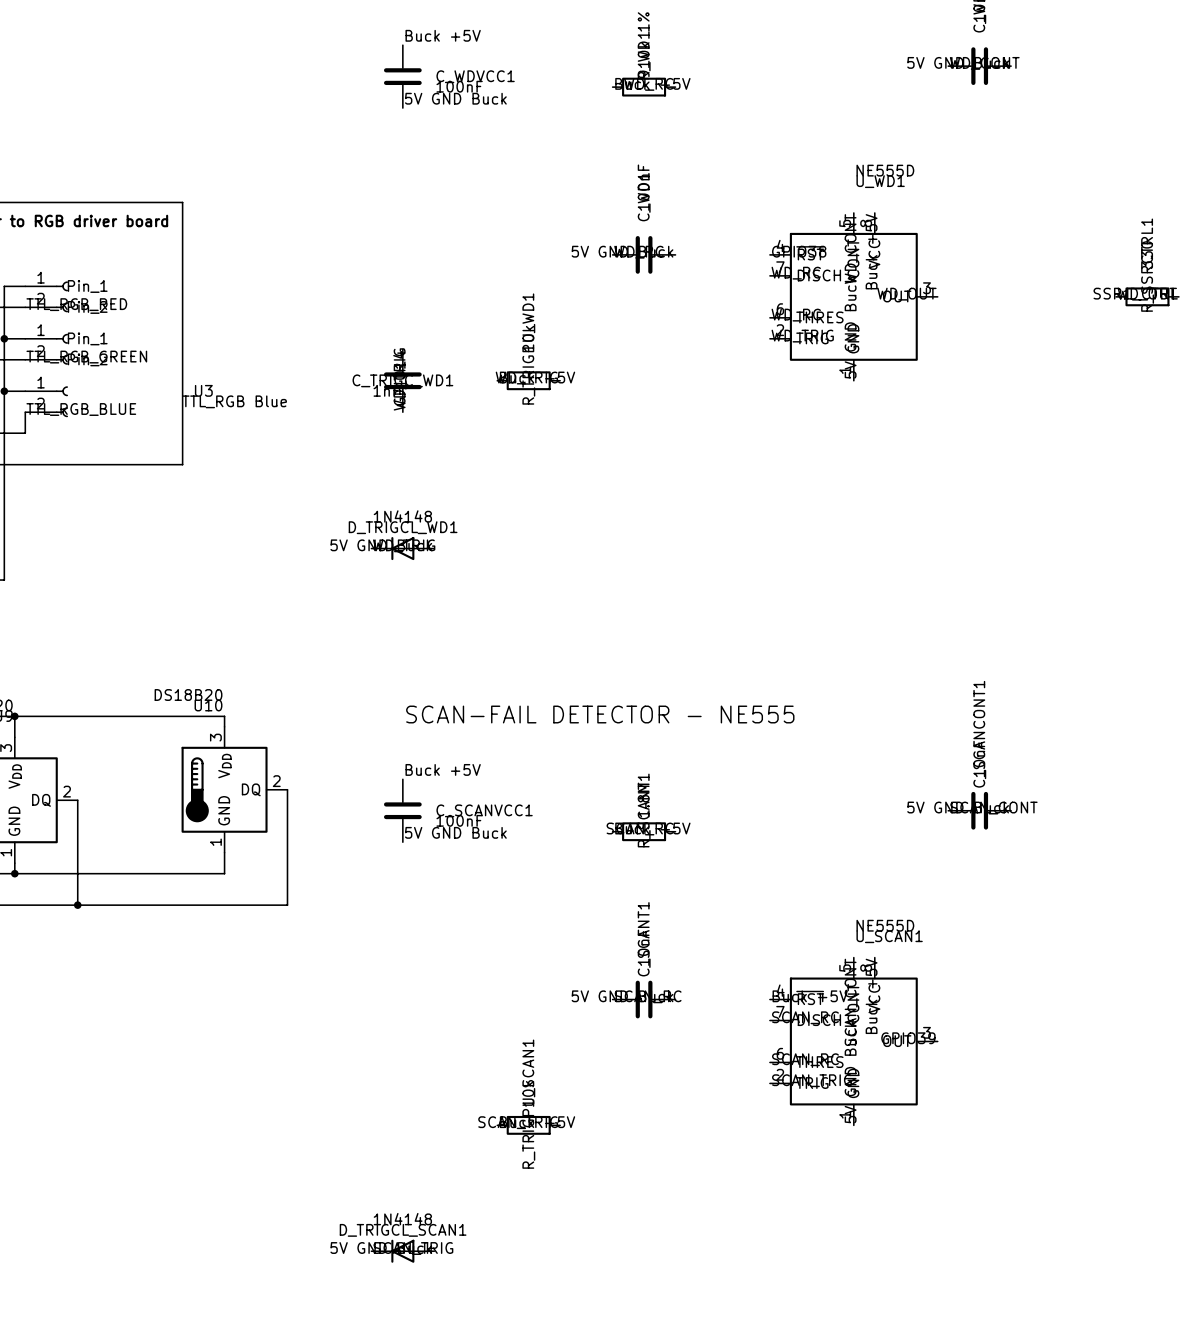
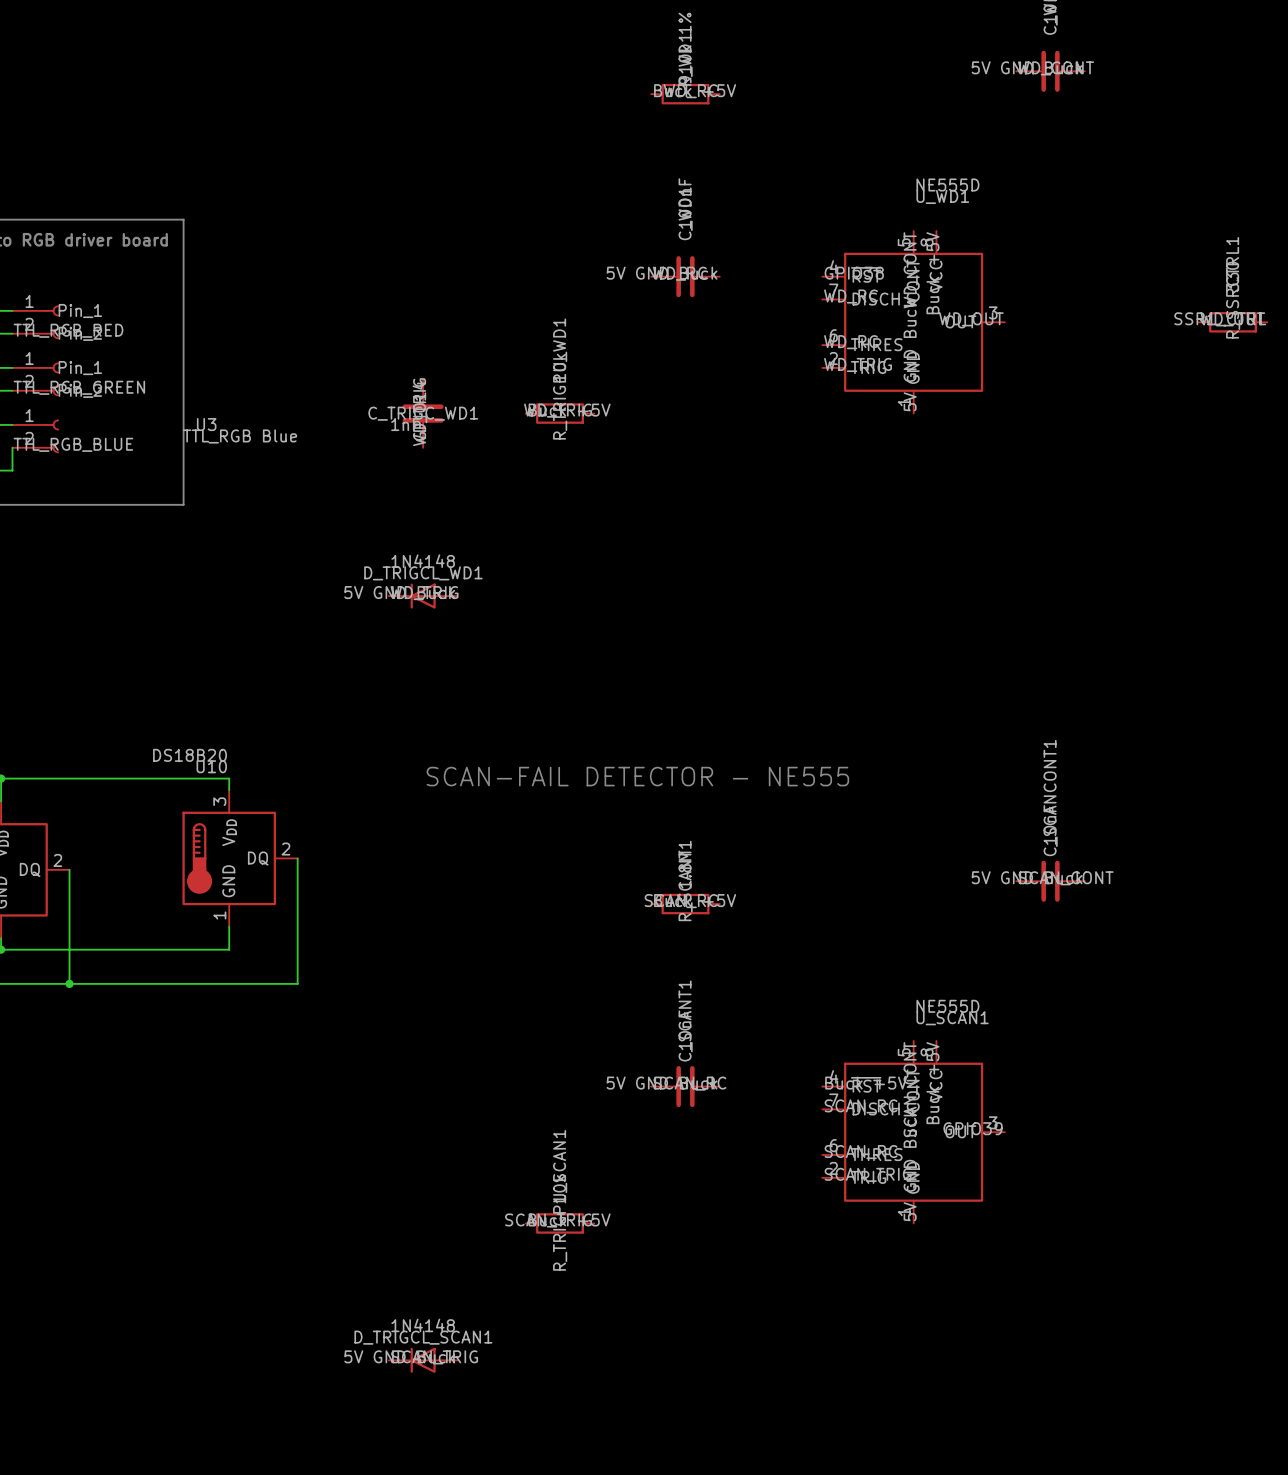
label: Buck +5V (443, 35) -> none
C_WDVCC1: 100nF (402, 76) -> none
label: 5V GND Buck (455, 98) -> none
label: Buck +5V (443, 769) -> none
C_SCANVCC1: 100nF (402, 810) -> none
label: 5V GND Buck (455, 832) -> none

